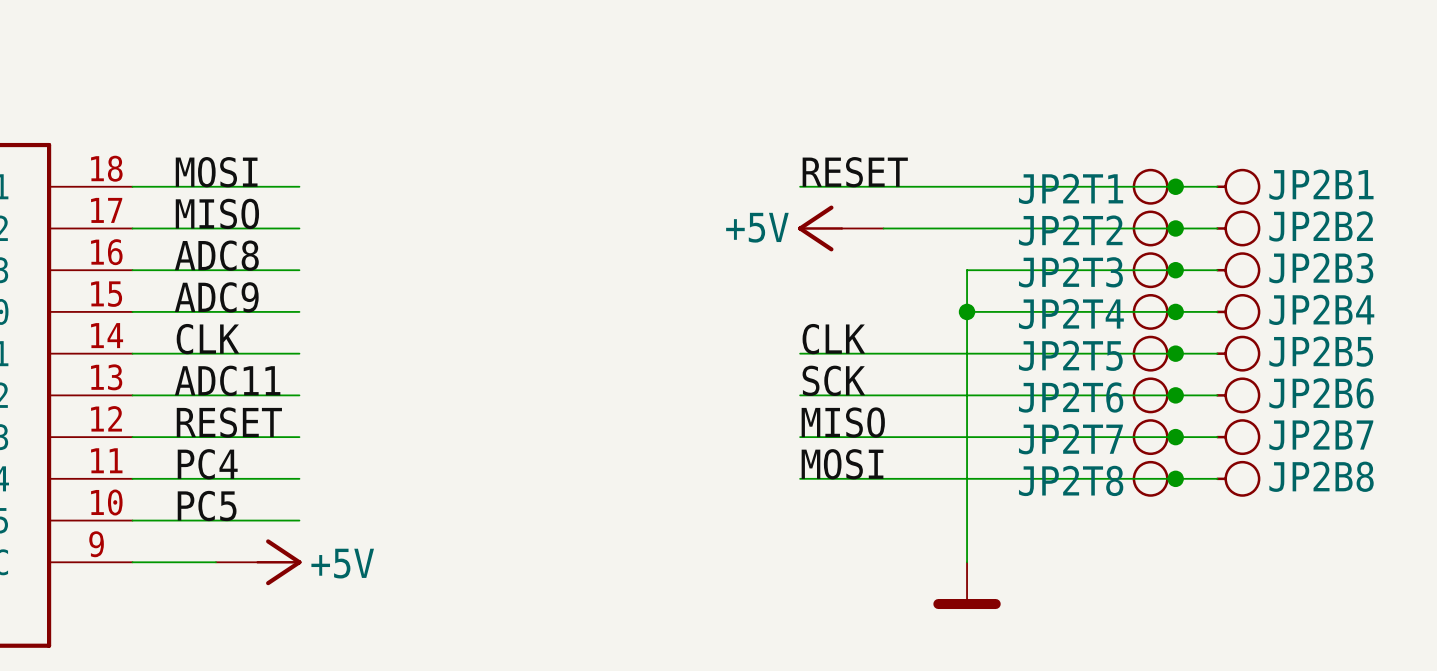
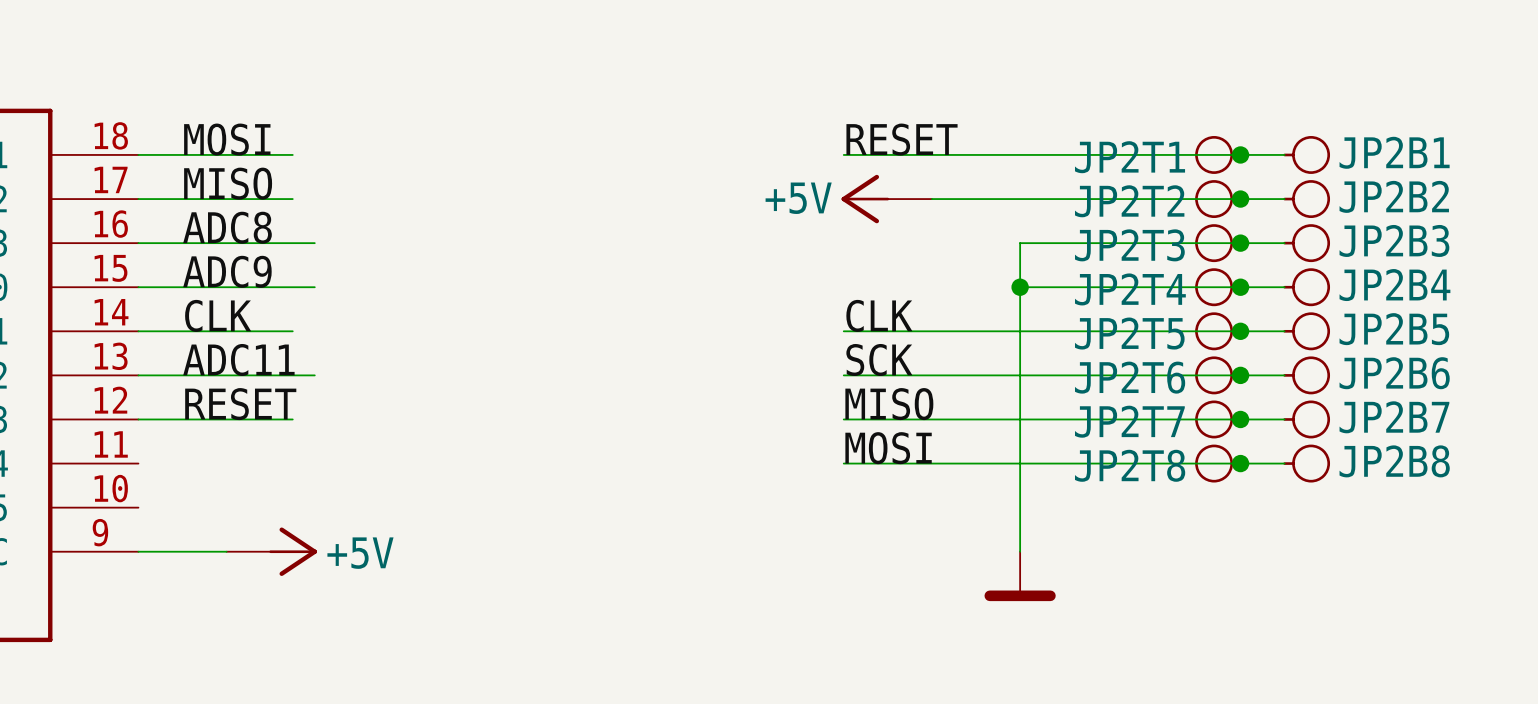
wire: (278, 186) (299, 186) -> none
wire: (278, 228) (299, 228) -> none
wire: (278, 353) (299, 353) -> none
wire: (278, 437) (299, 437) -> none
label: PC4 (207, 464) -> none
wire: (132, 478) (299, 478) -> none
label: PC5 (207, 505) -> none
wire: (132, 520) (299, 520) -> none

